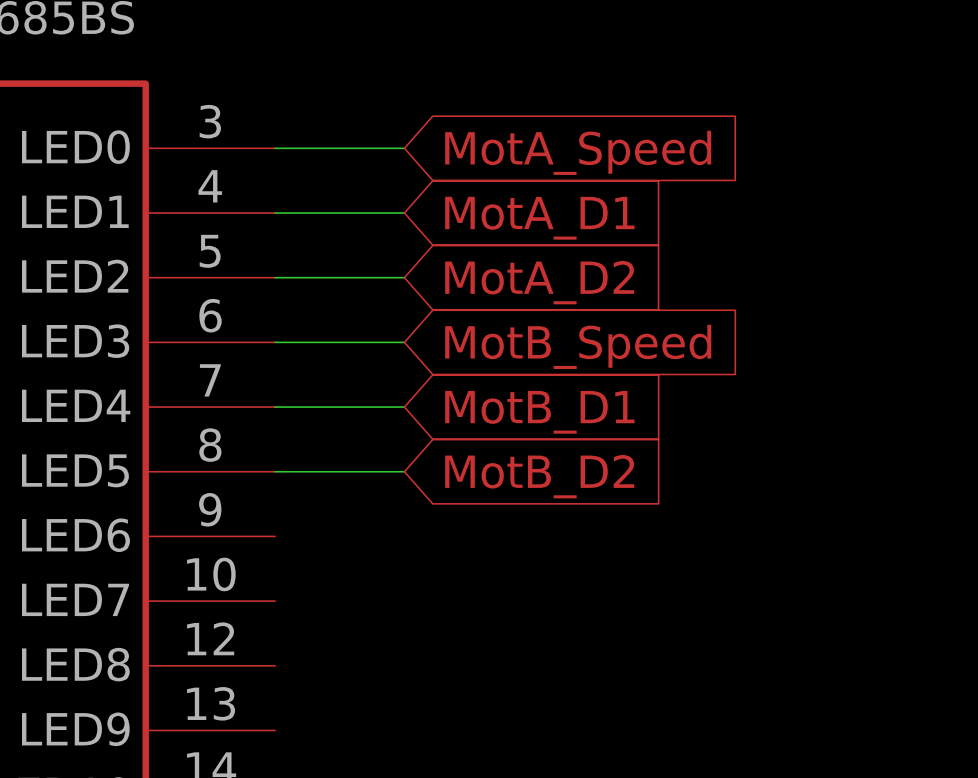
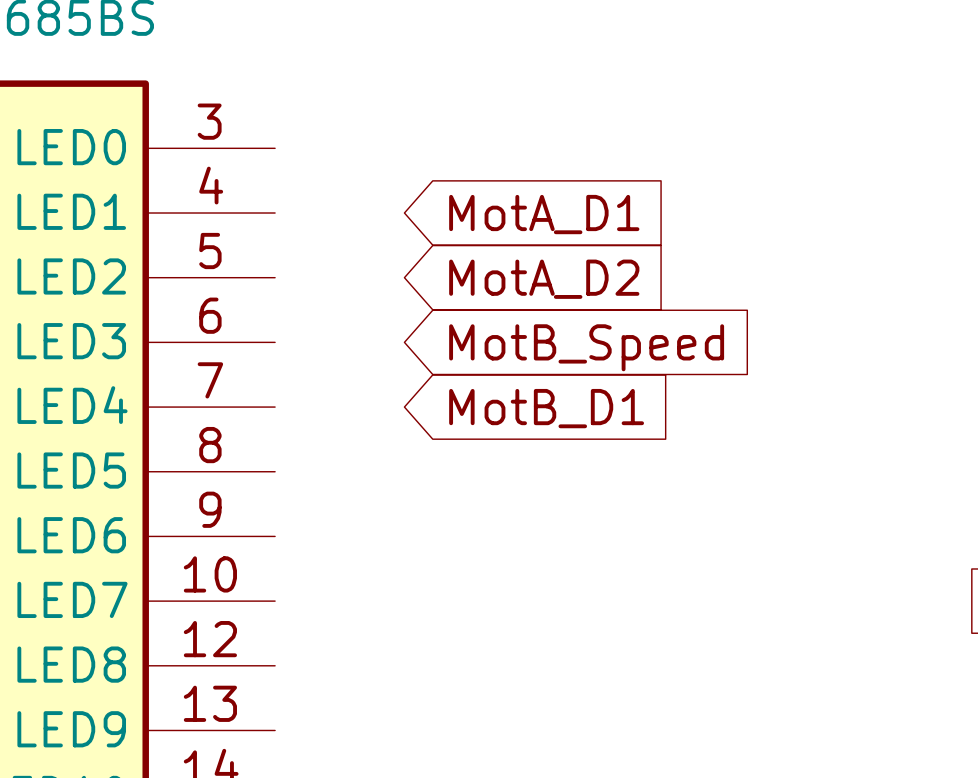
wire: (275, 148) (404, 148) -> none
global label: MotA_Speed (578, 152) -> none
wire: (275, 213) (404, 213) -> none
wire: (275, 277) (404, 277) -> none
wire: (275, 342) (404, 342) -> none
wire: (275, 407) (404, 407) -> none
wire: (275, 471) (404, 471) -> none
global label: MotB_D2 (539, 476) -> none

